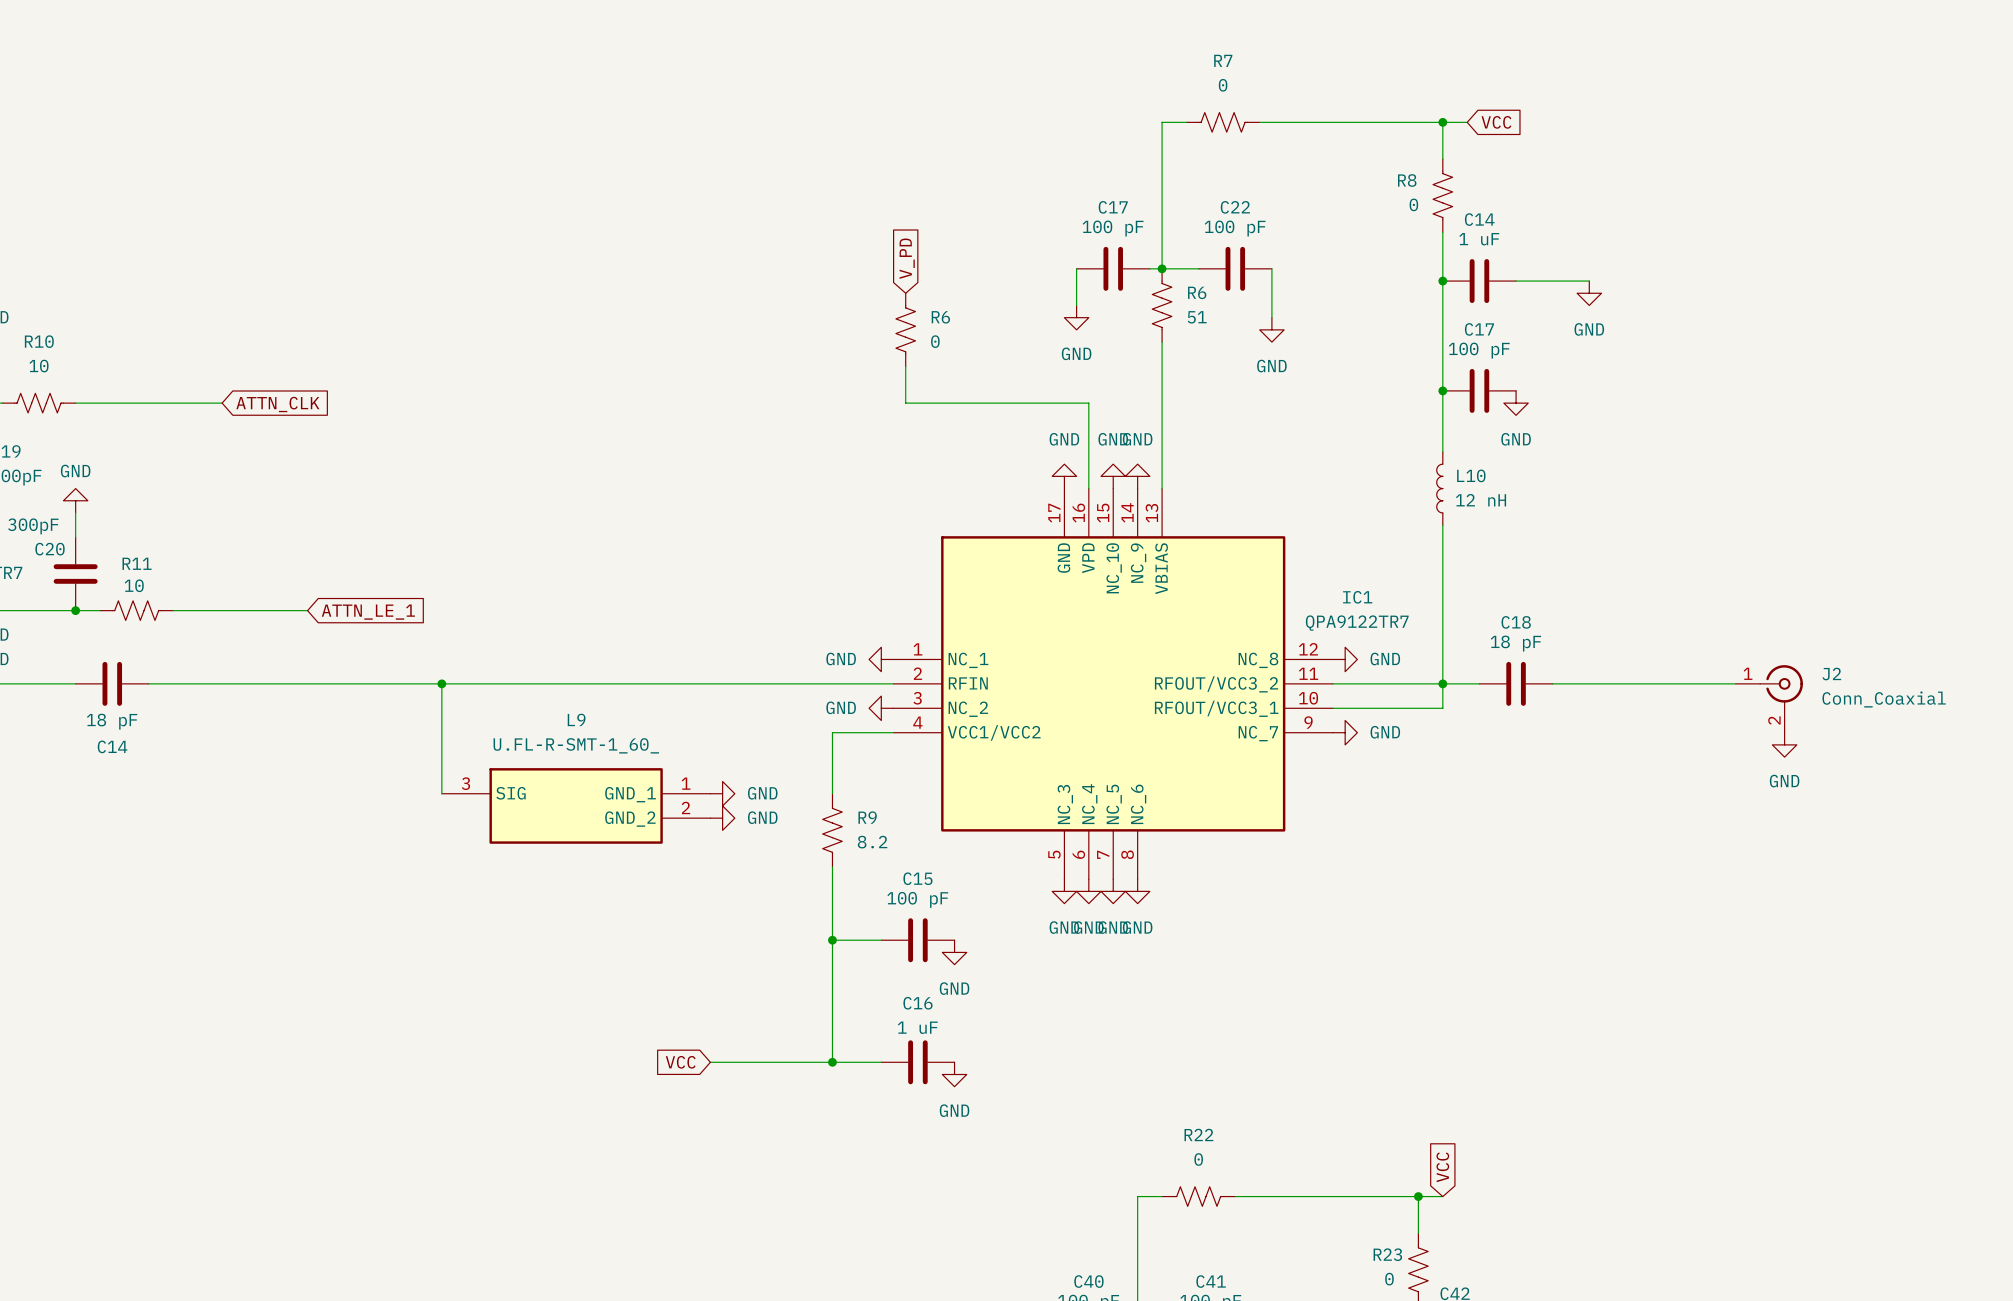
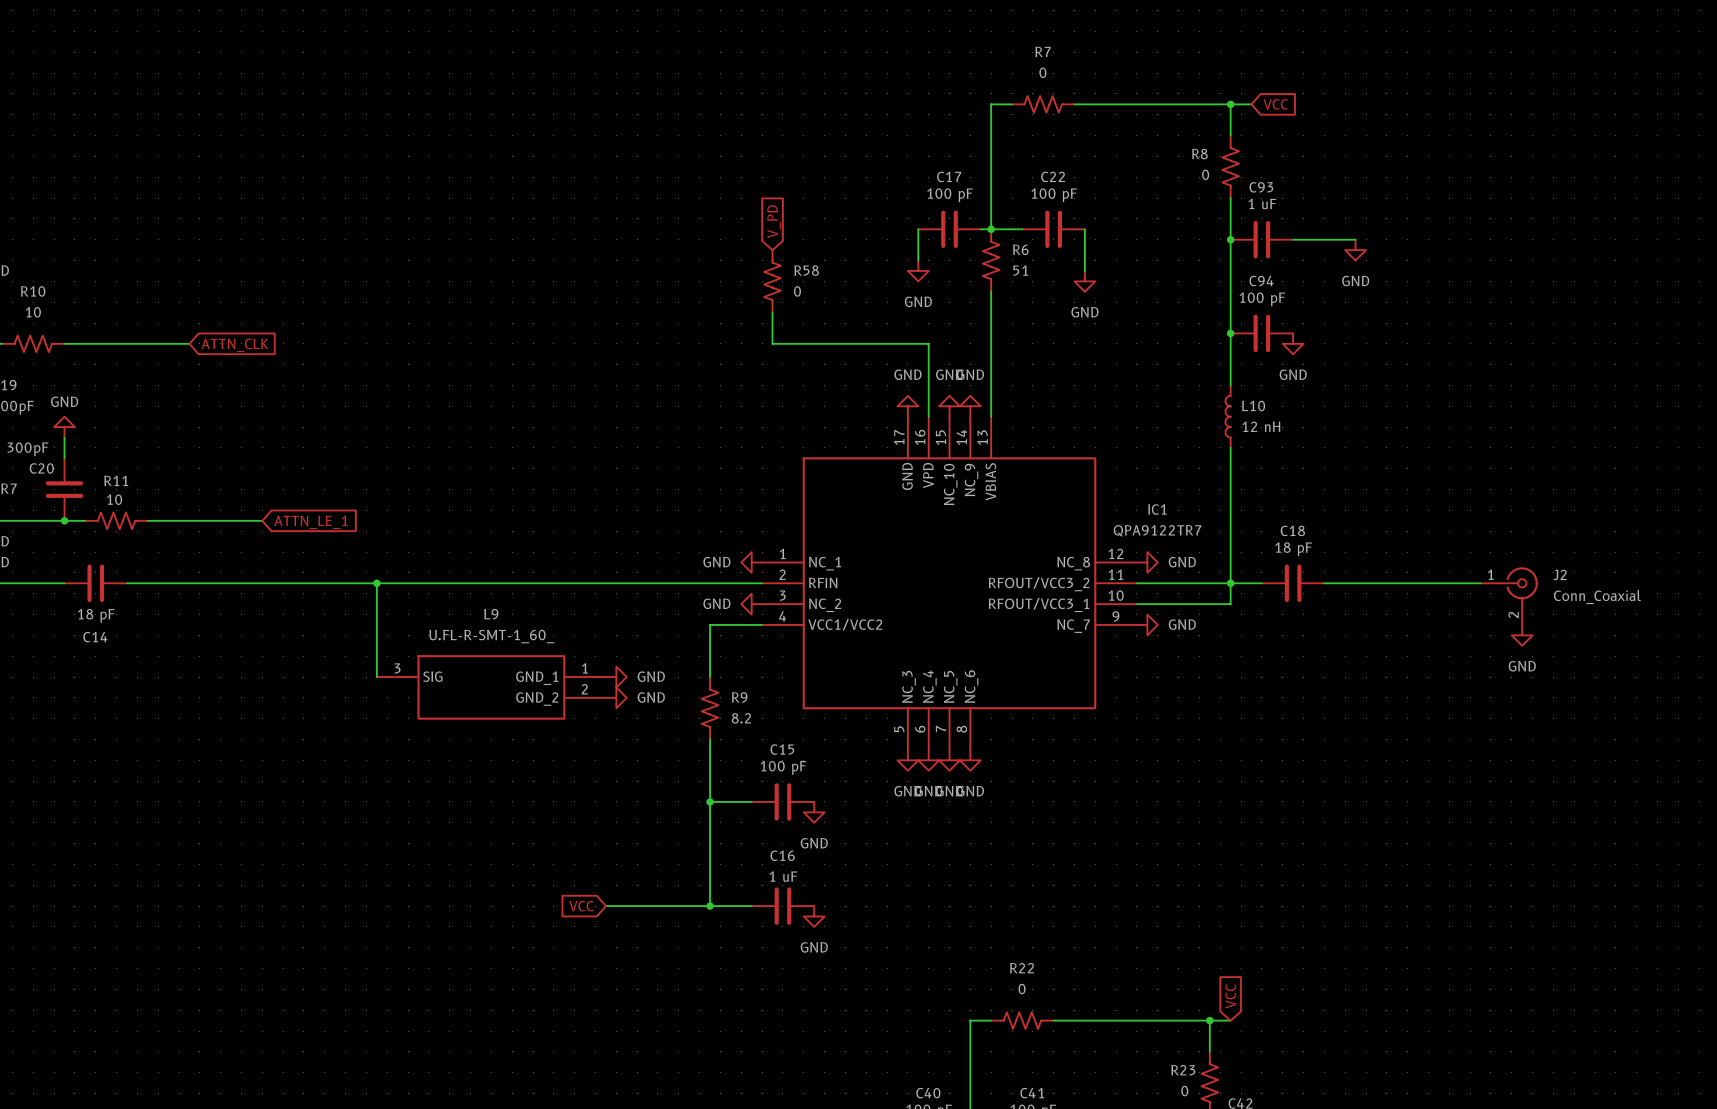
C14 name: C14 (1479, 219) -> C93 (1261, 187)
R6 name: R6 (940, 317) -> R58 (806, 270)
C17 name: C17 (1479, 329) -> C94 (1261, 281)

